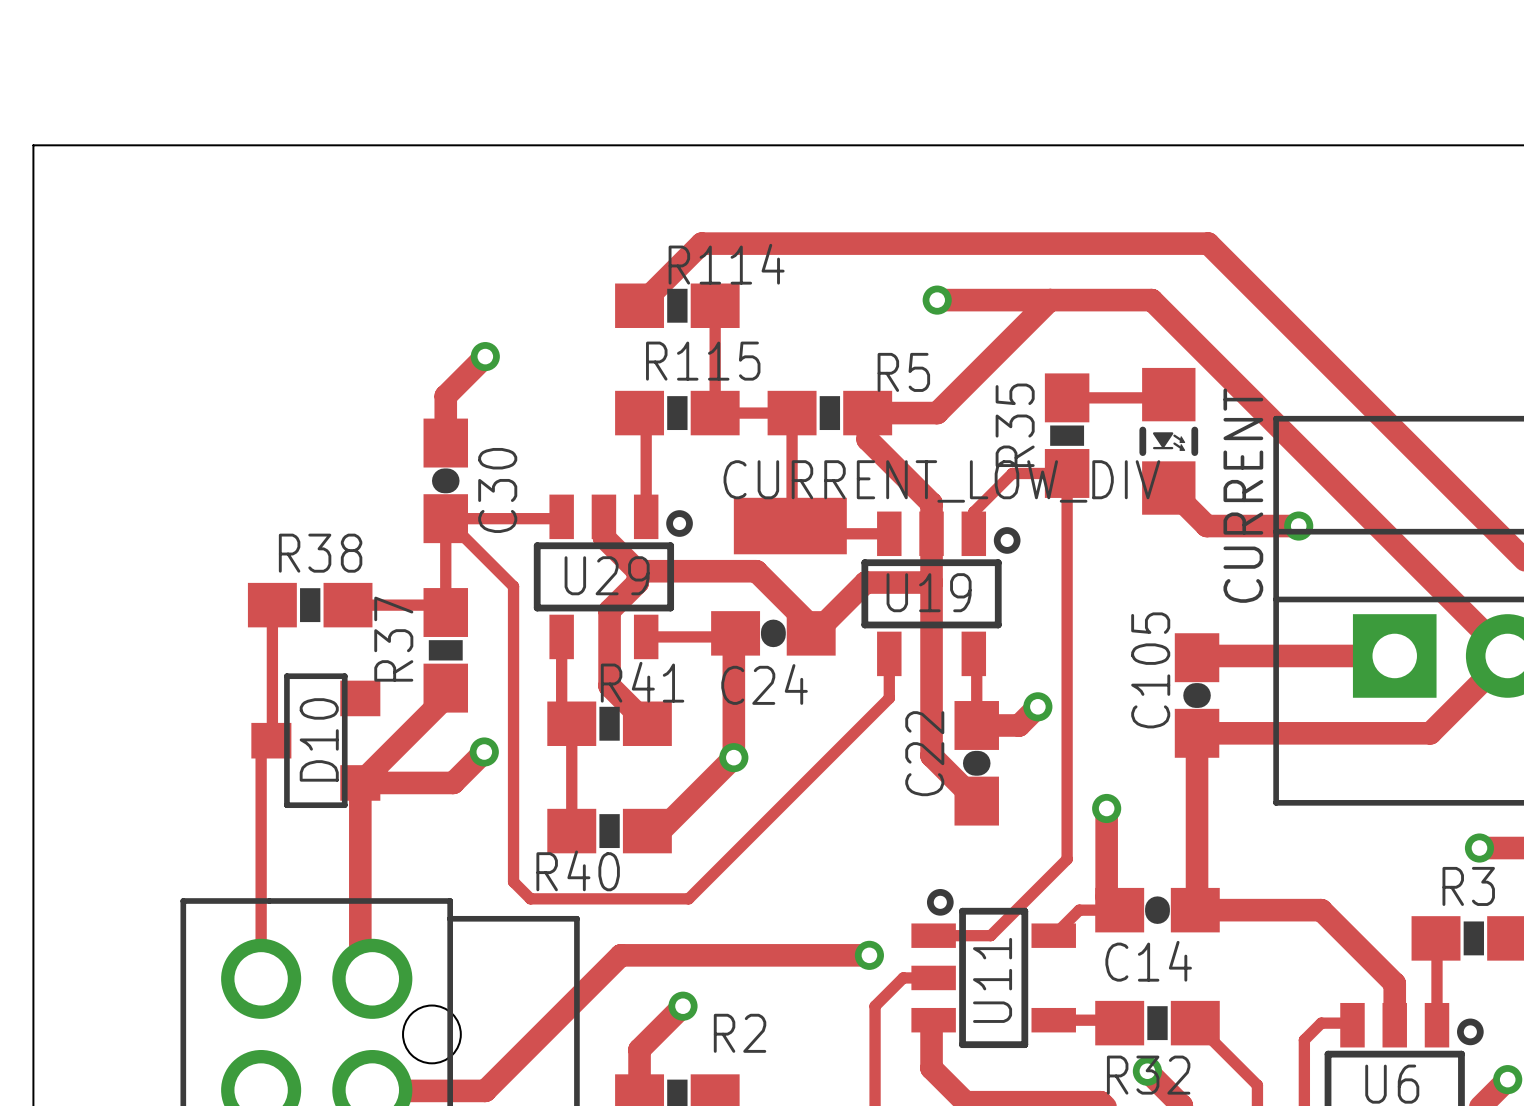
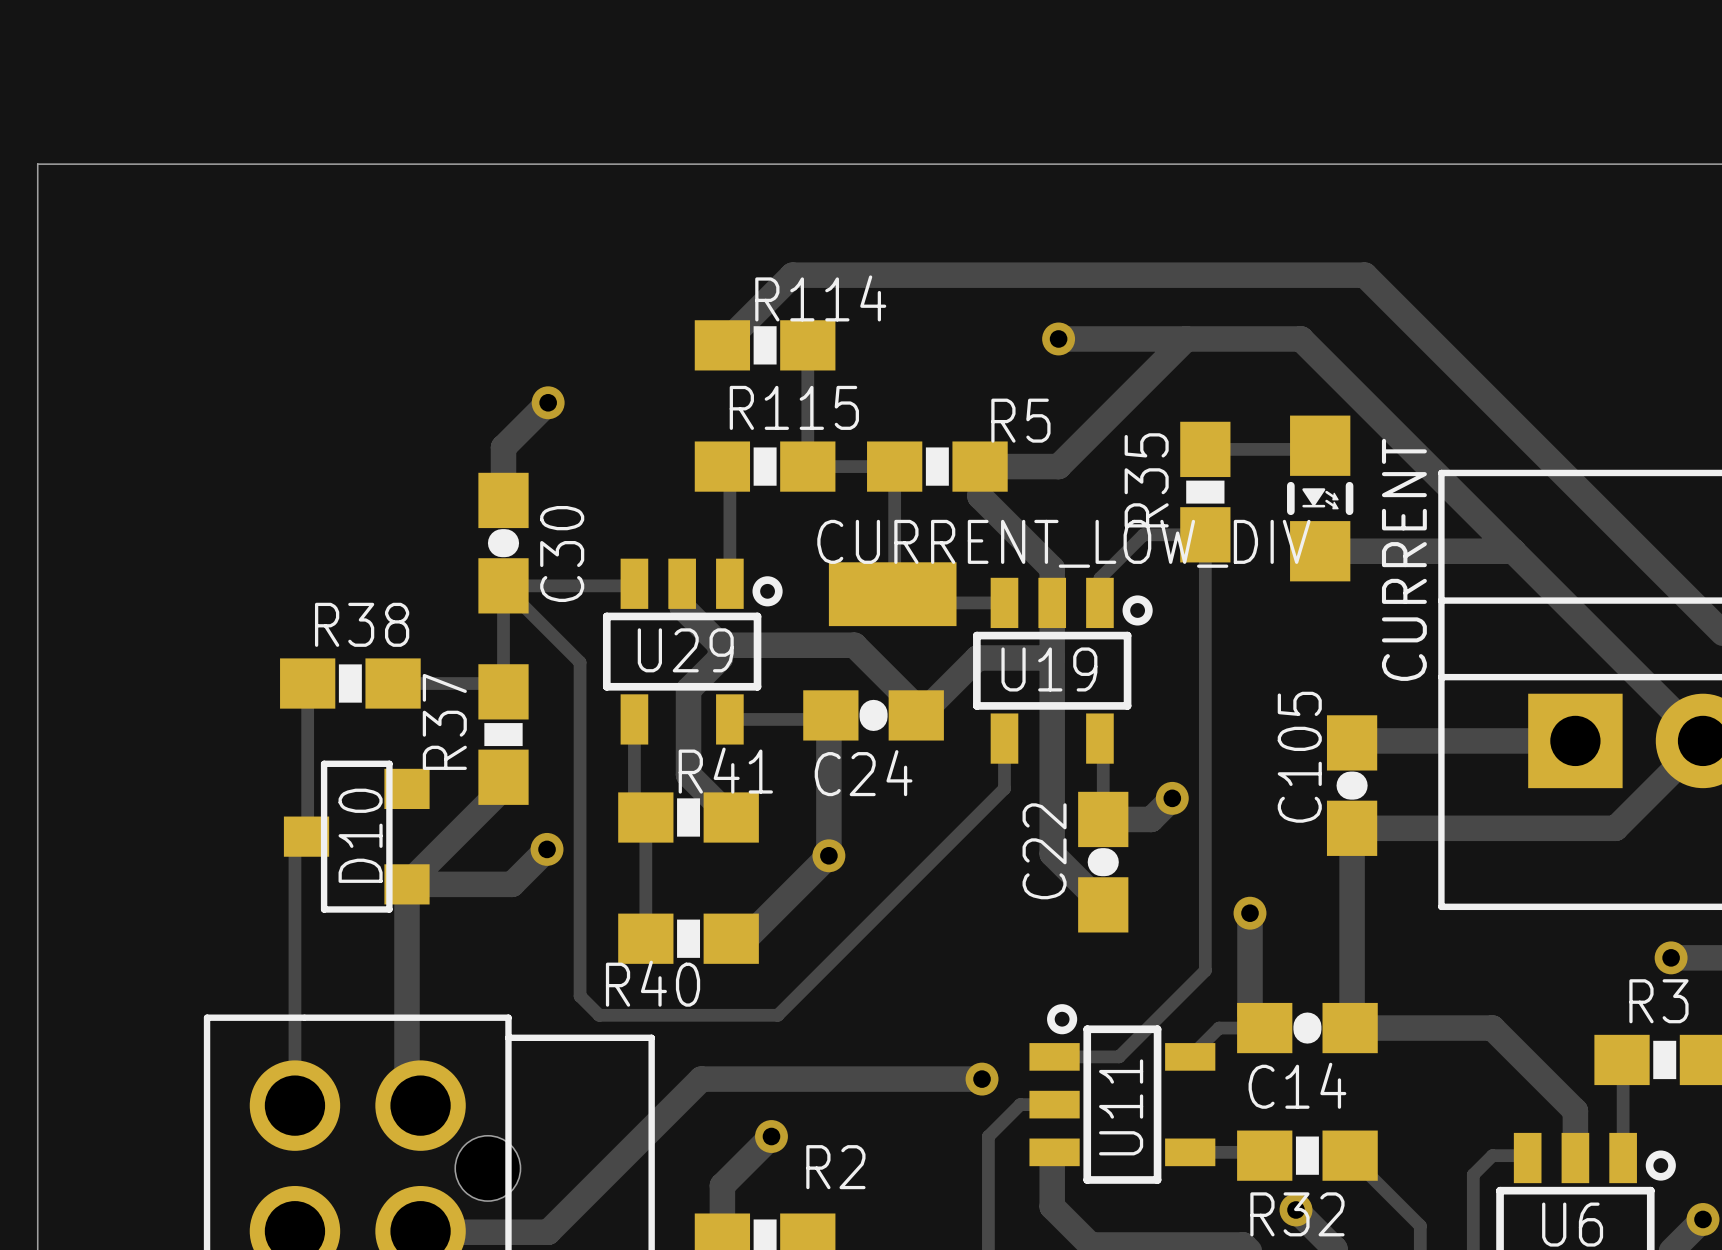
track: (1168, 488) (1206, 526) (1298, 526) -> (1320, 551) (1513, 551)
via: (1298, 526) -> none

